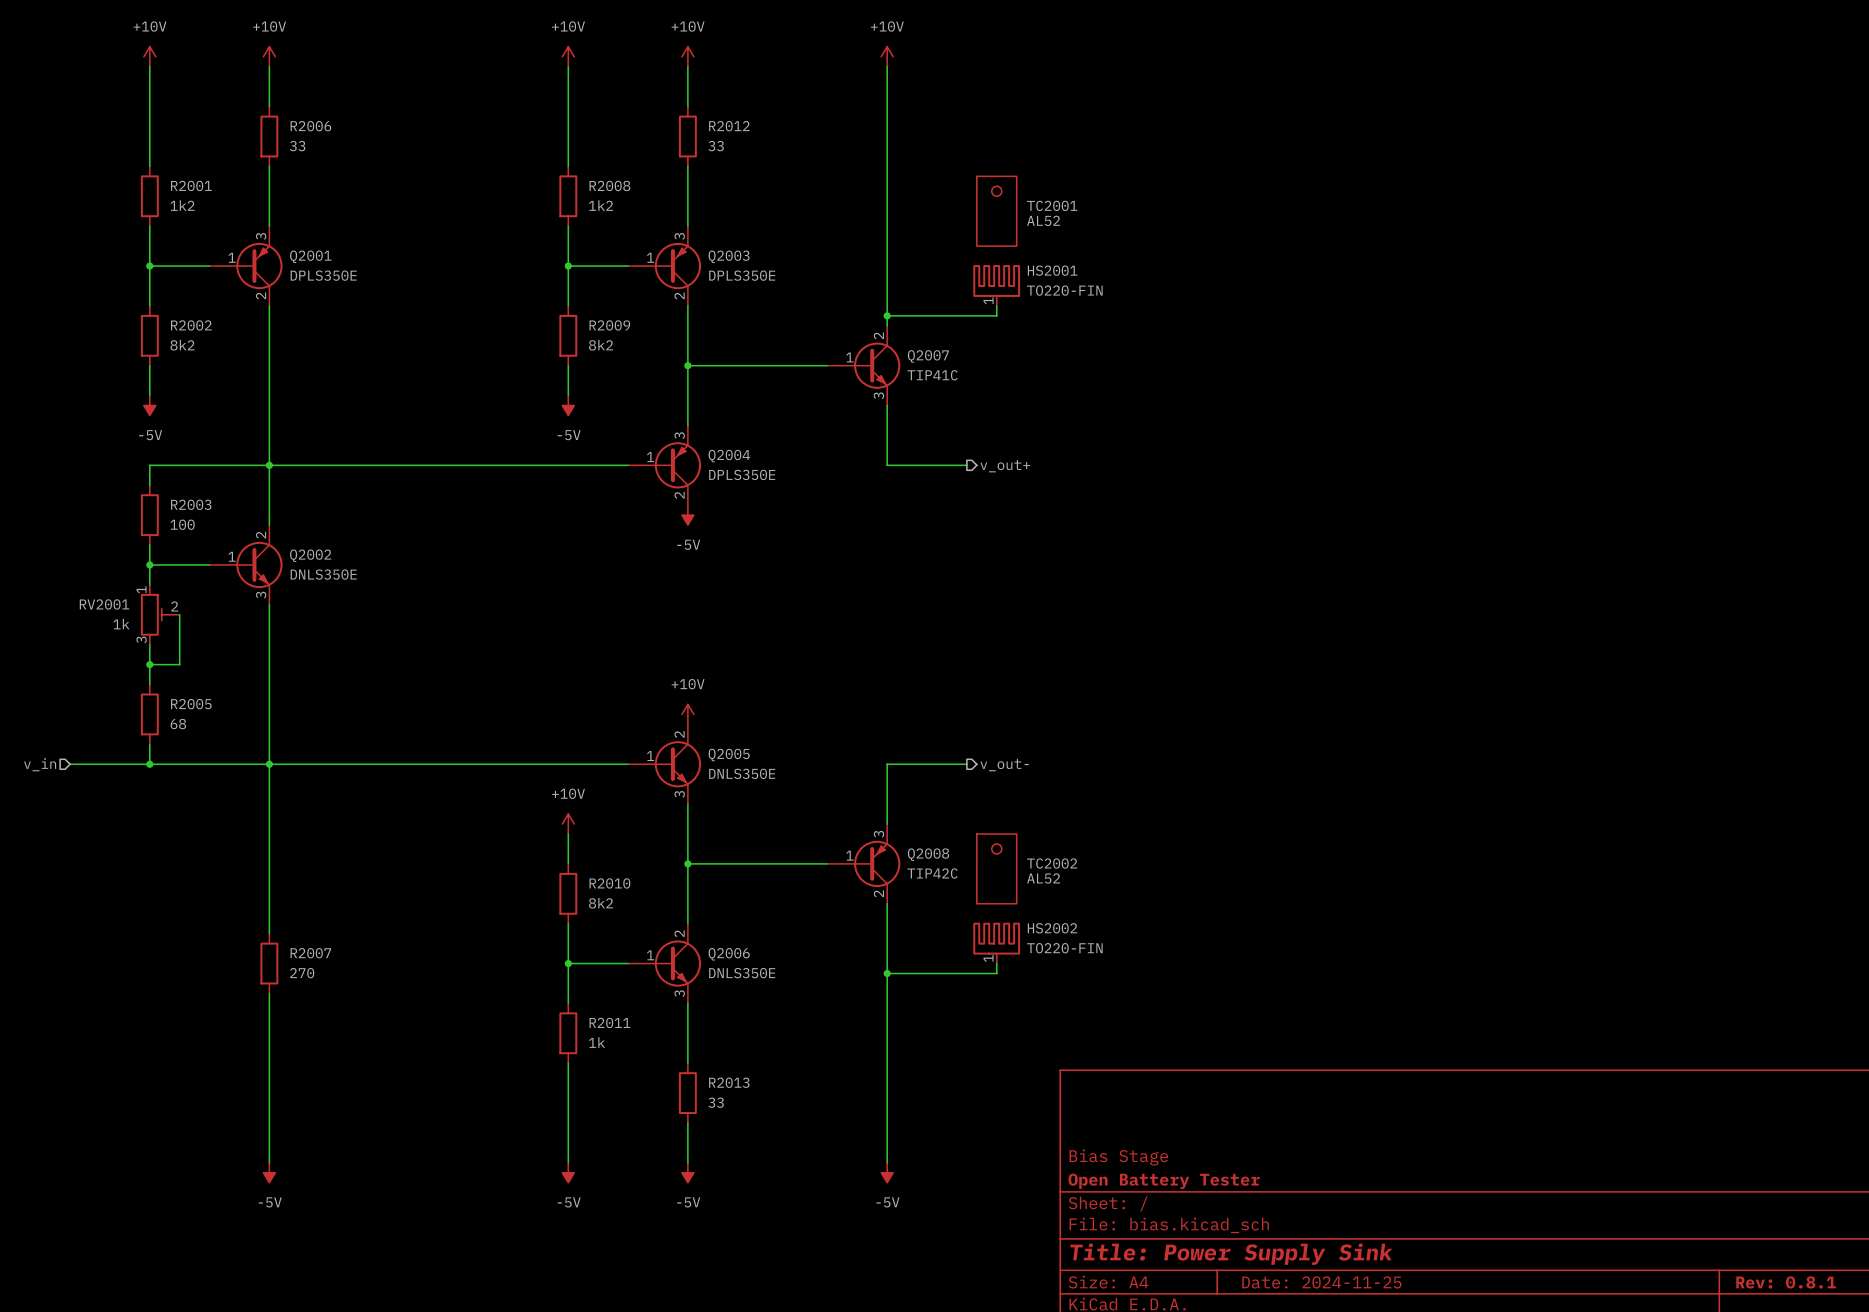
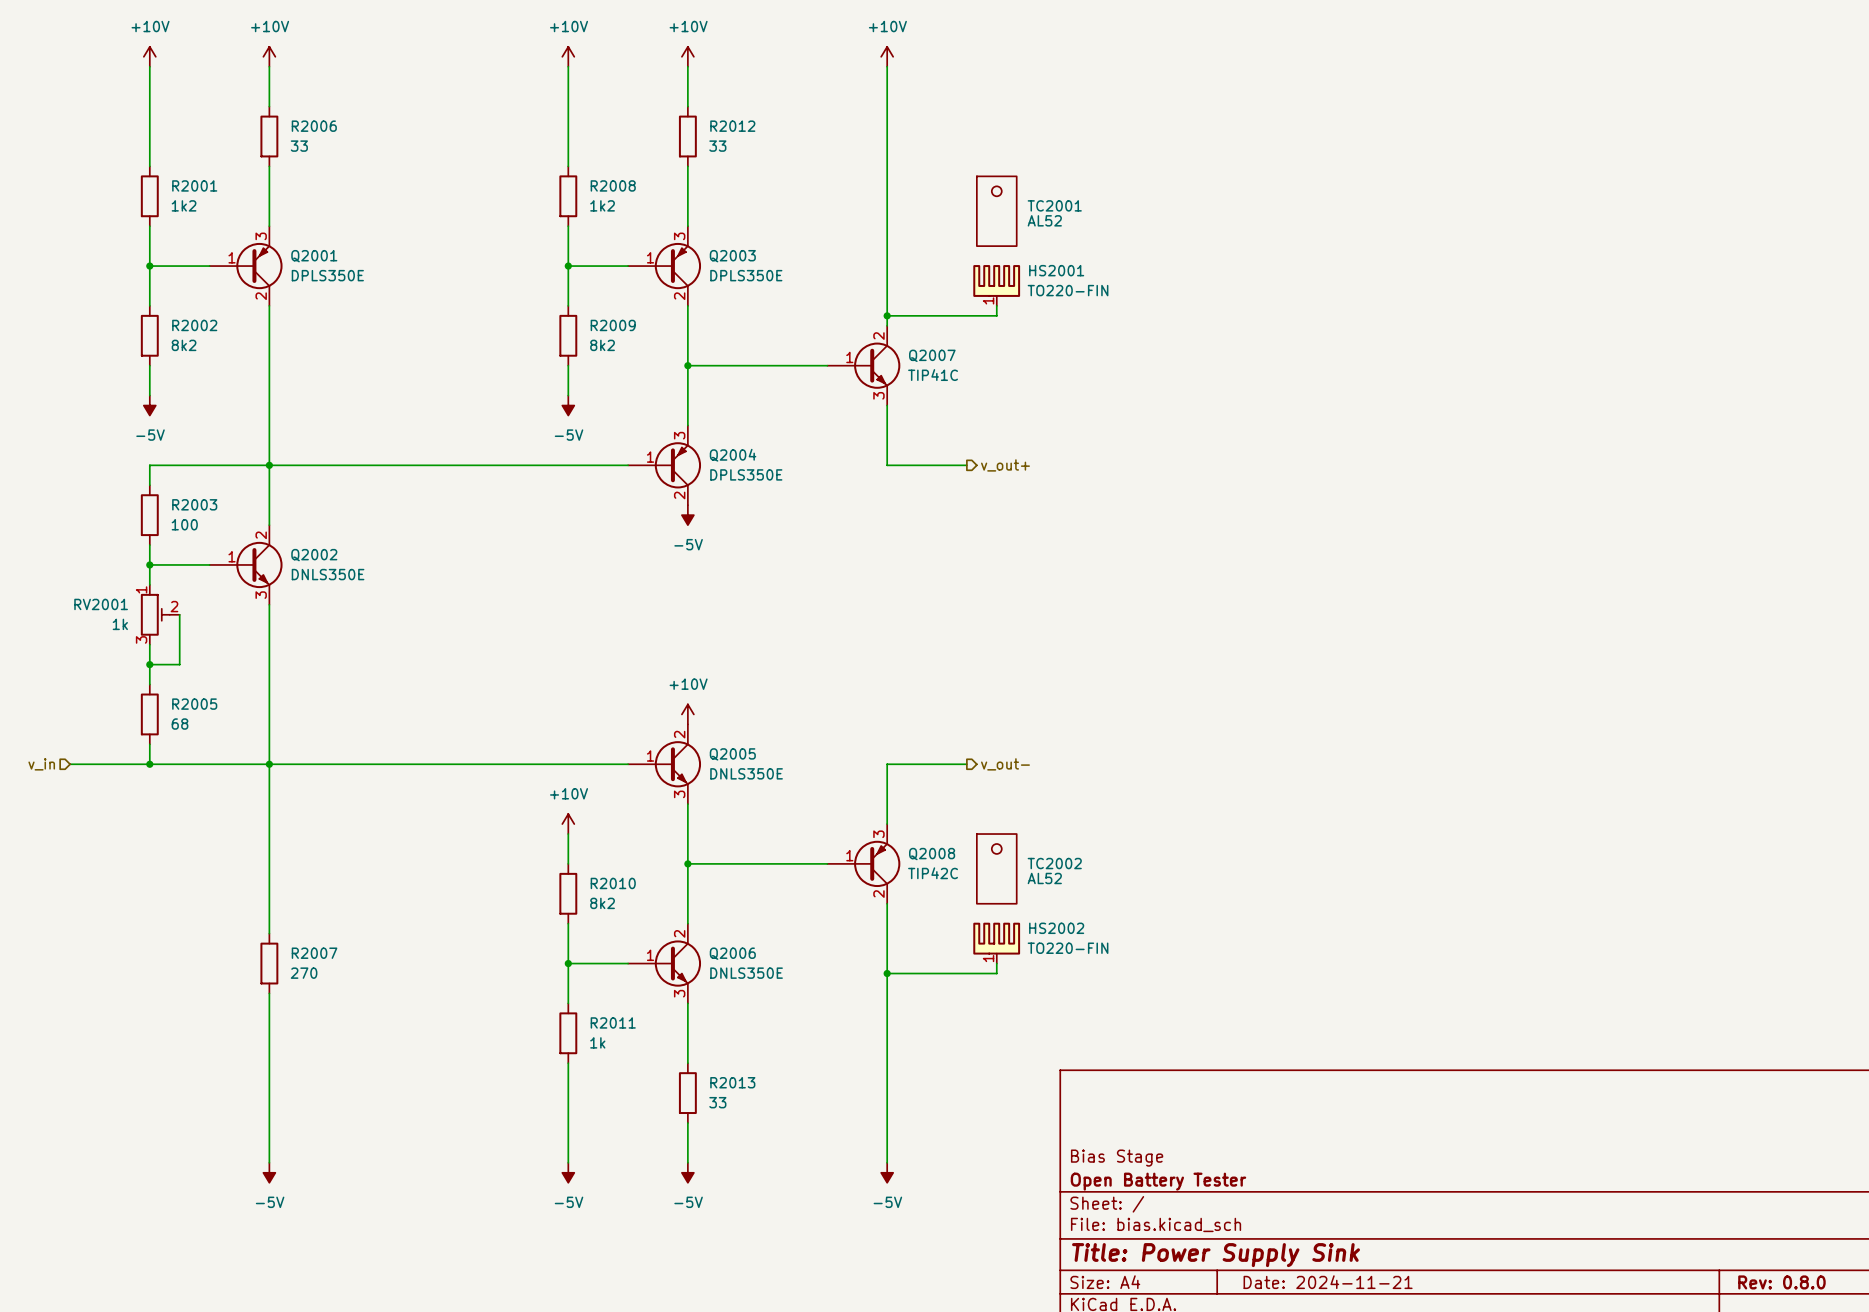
title block: Date: 2024-11-25 (1321, 1282) -> Date: 2024-11-21 (1328, 1282)
title block: Rev: 0.8.1 (1786, 1282) -> Rev: 0.8.0 (1781, 1282)

